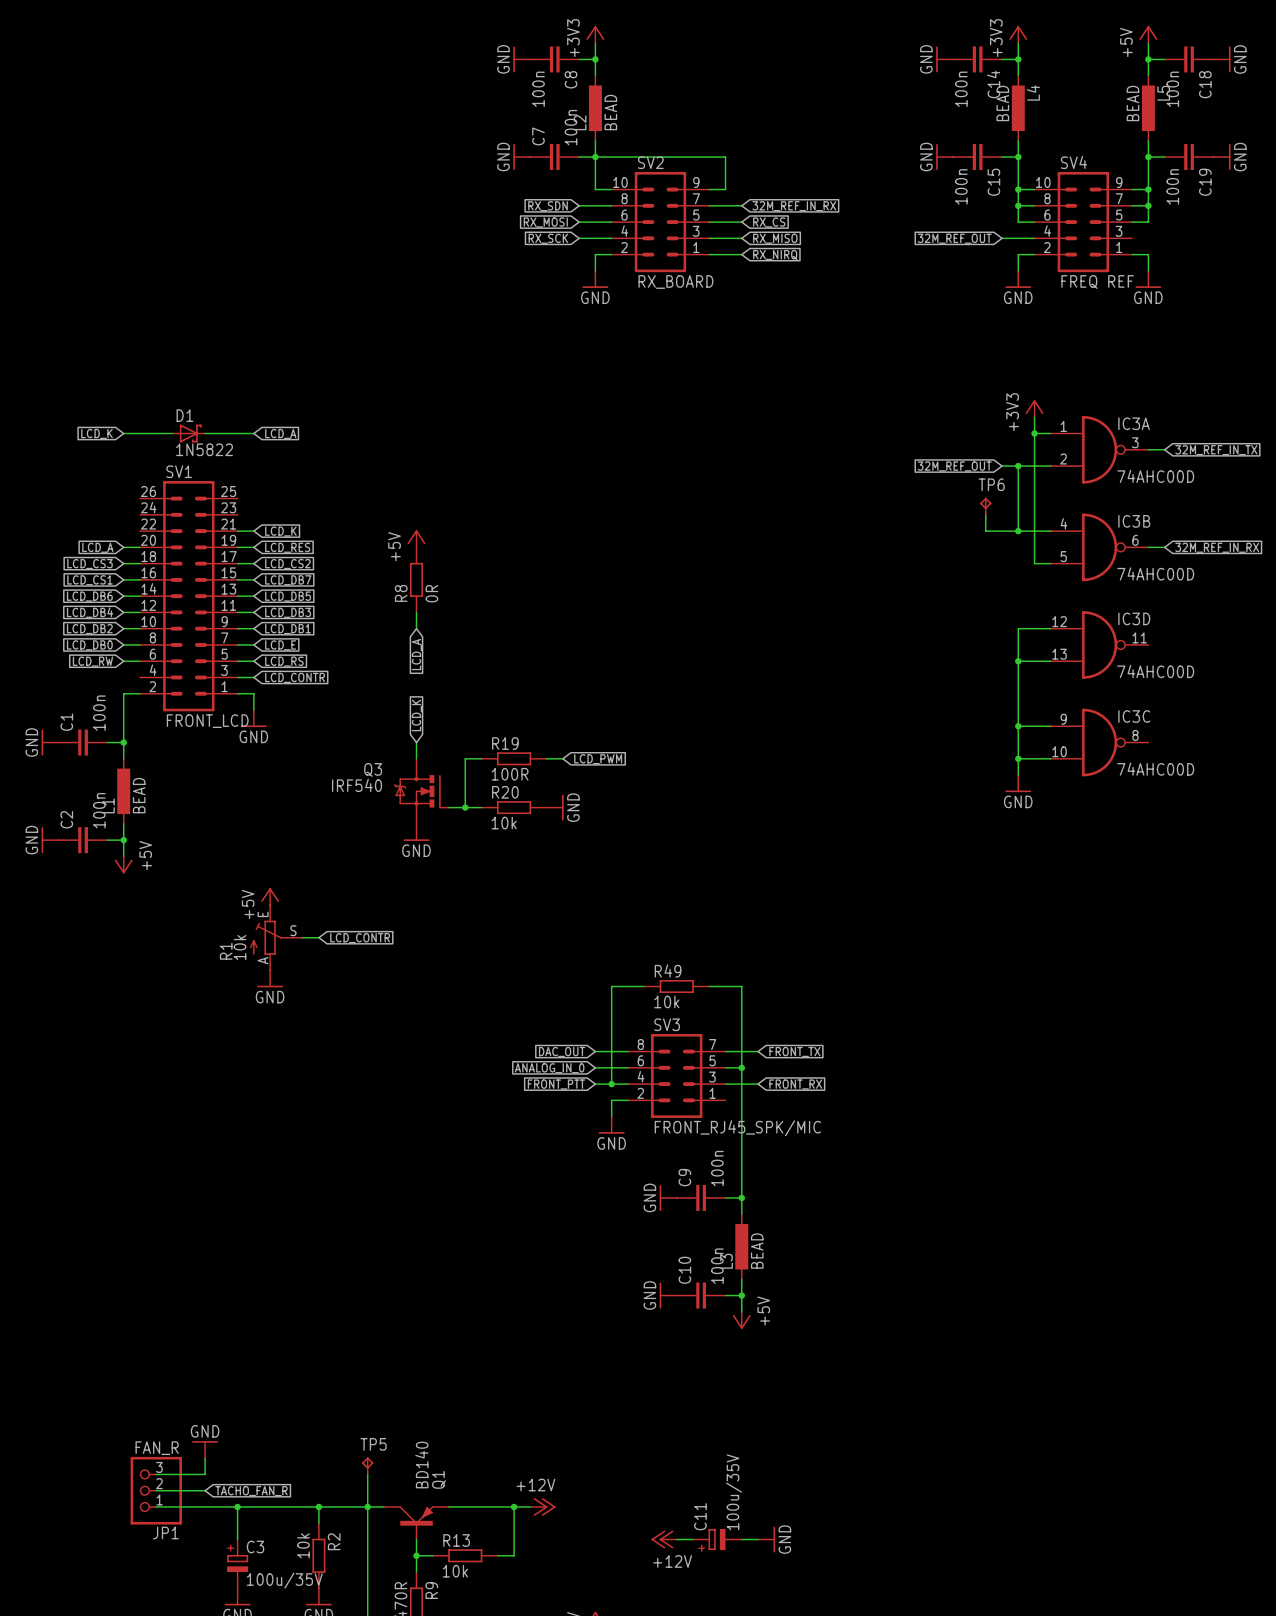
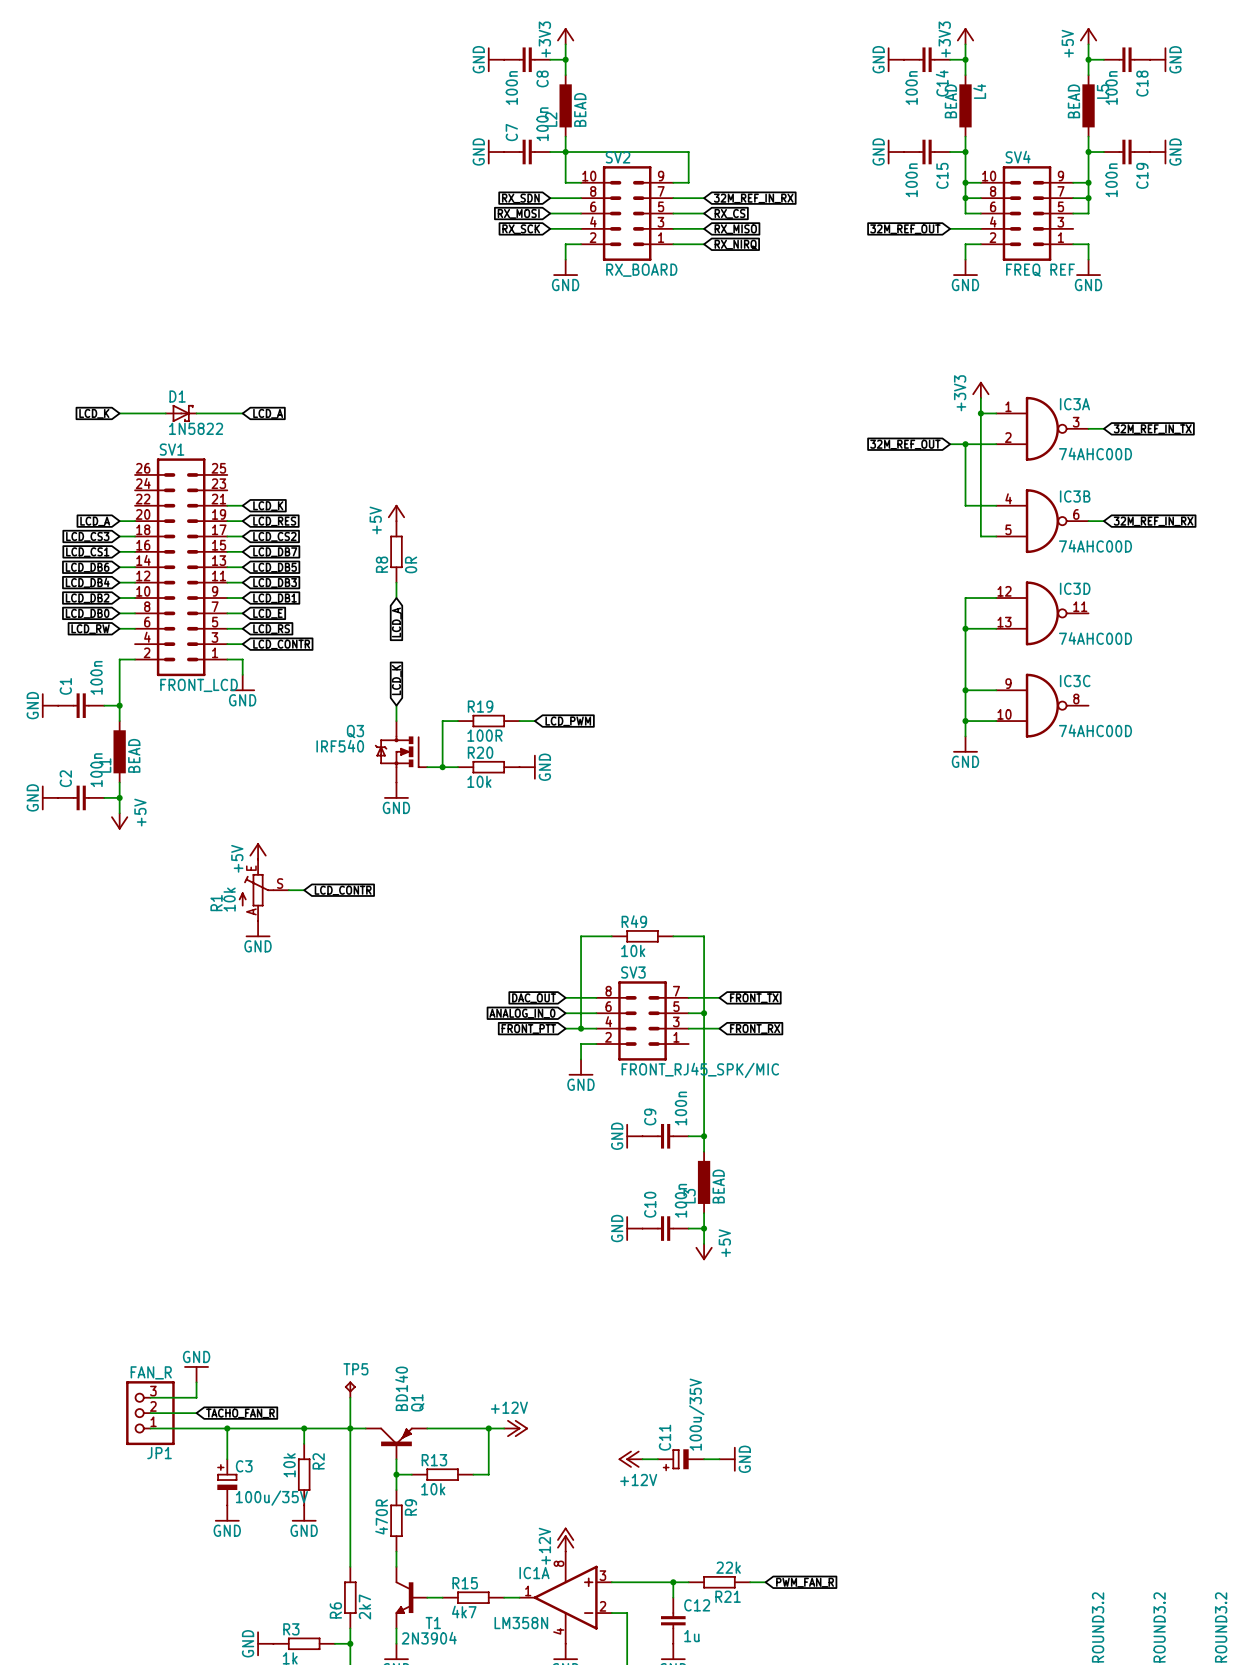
TP6: (985, 506) -> none
wire: (985, 514) (985, 531) (1018, 531) -> none
junction: (1018, 531) -> none

